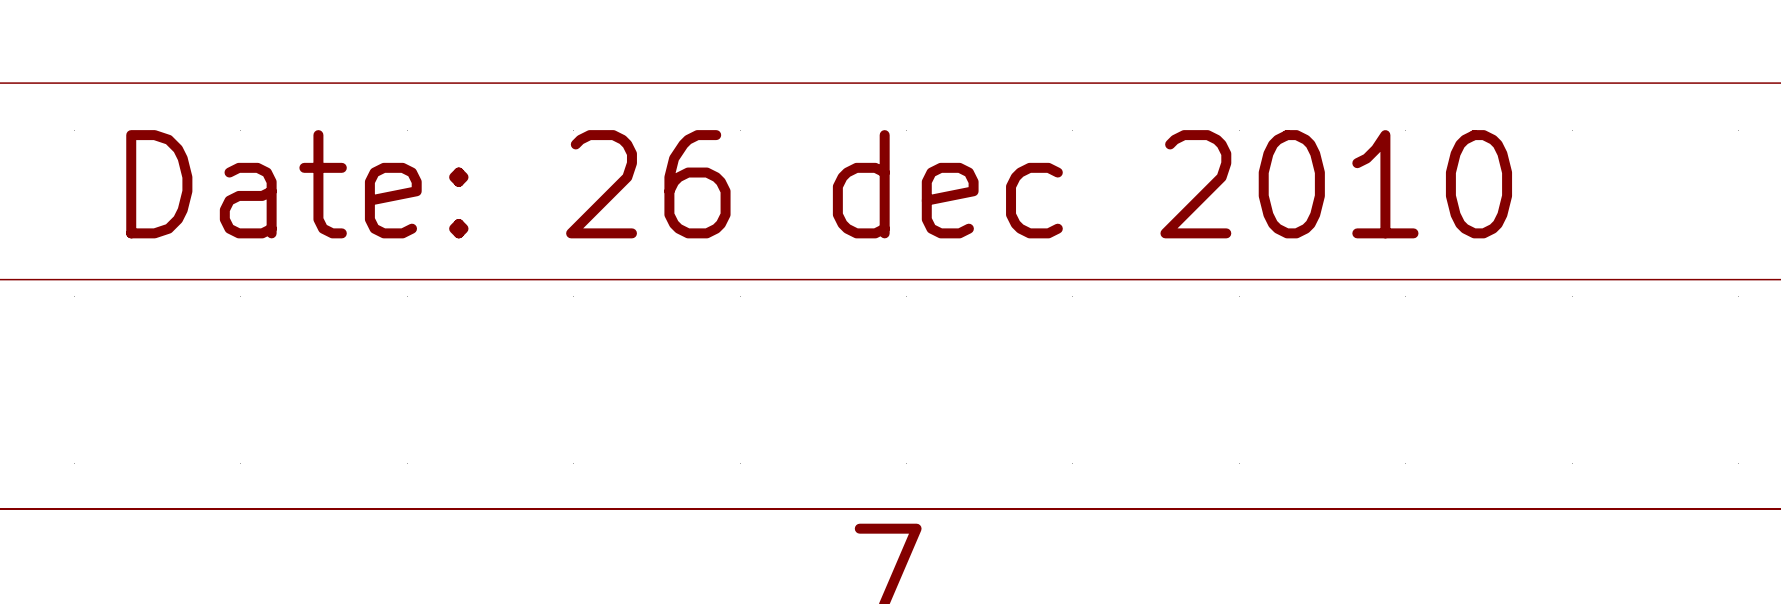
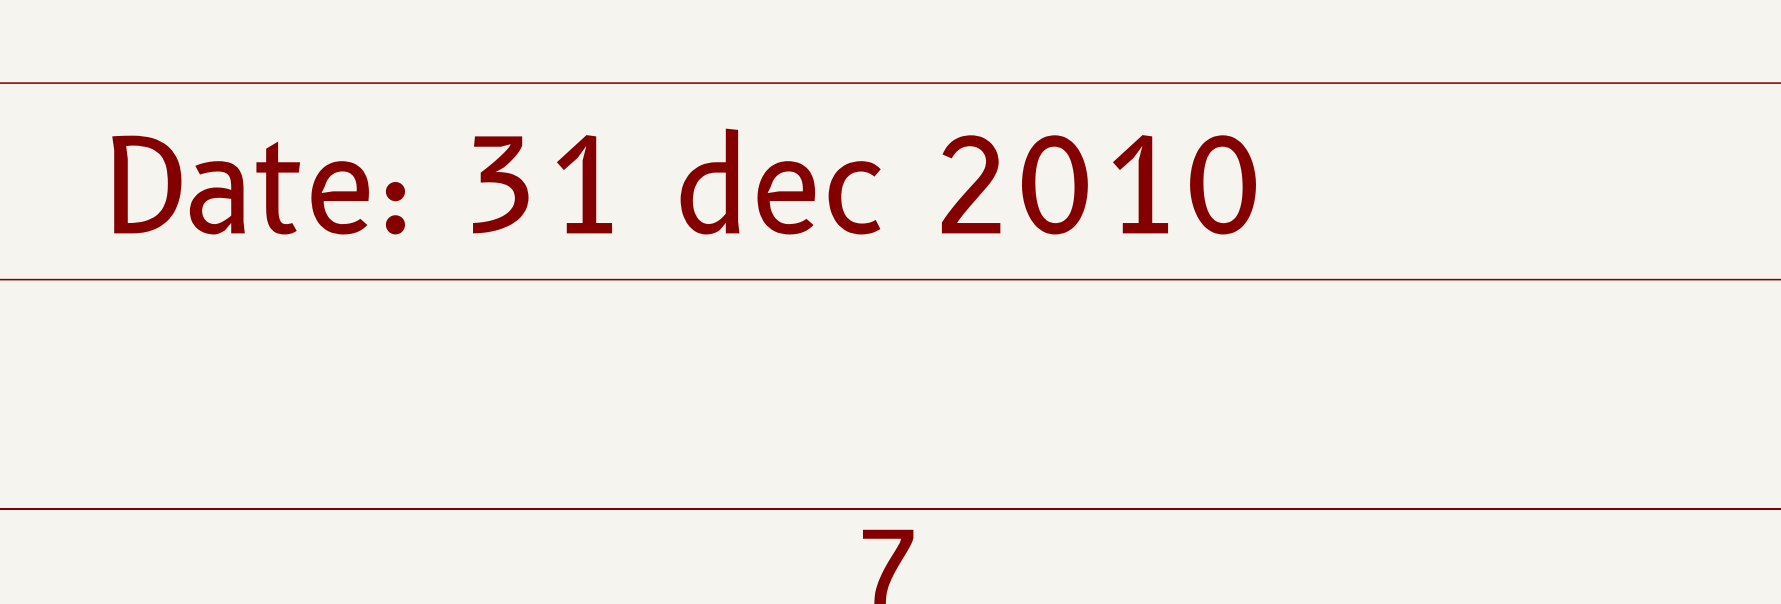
title block: Date: 26 dec 2010 (819, 184) -> Date: 31 dec 2010 (684, 181)

